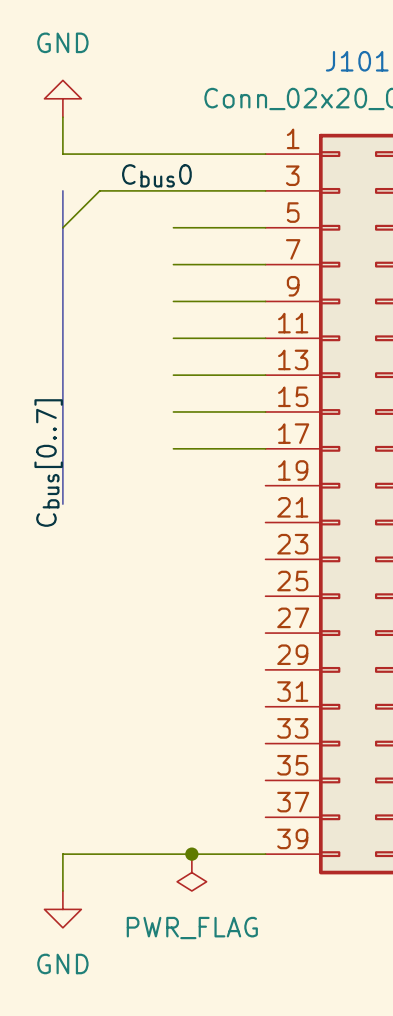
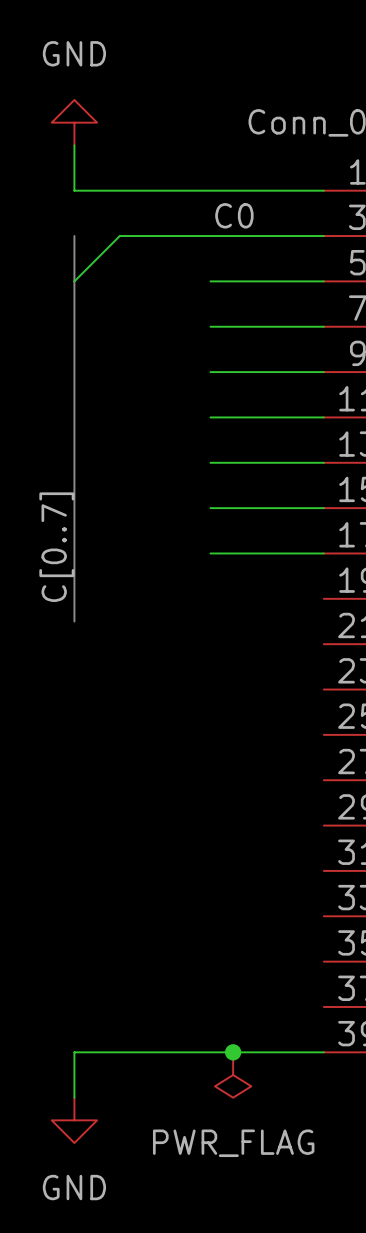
label: none -> C0 (234, 215)
label: Cbus0 (156, 175) -> none
label: Cbus[0..7] (48, 463) -> C[0..7] (56, 547)

